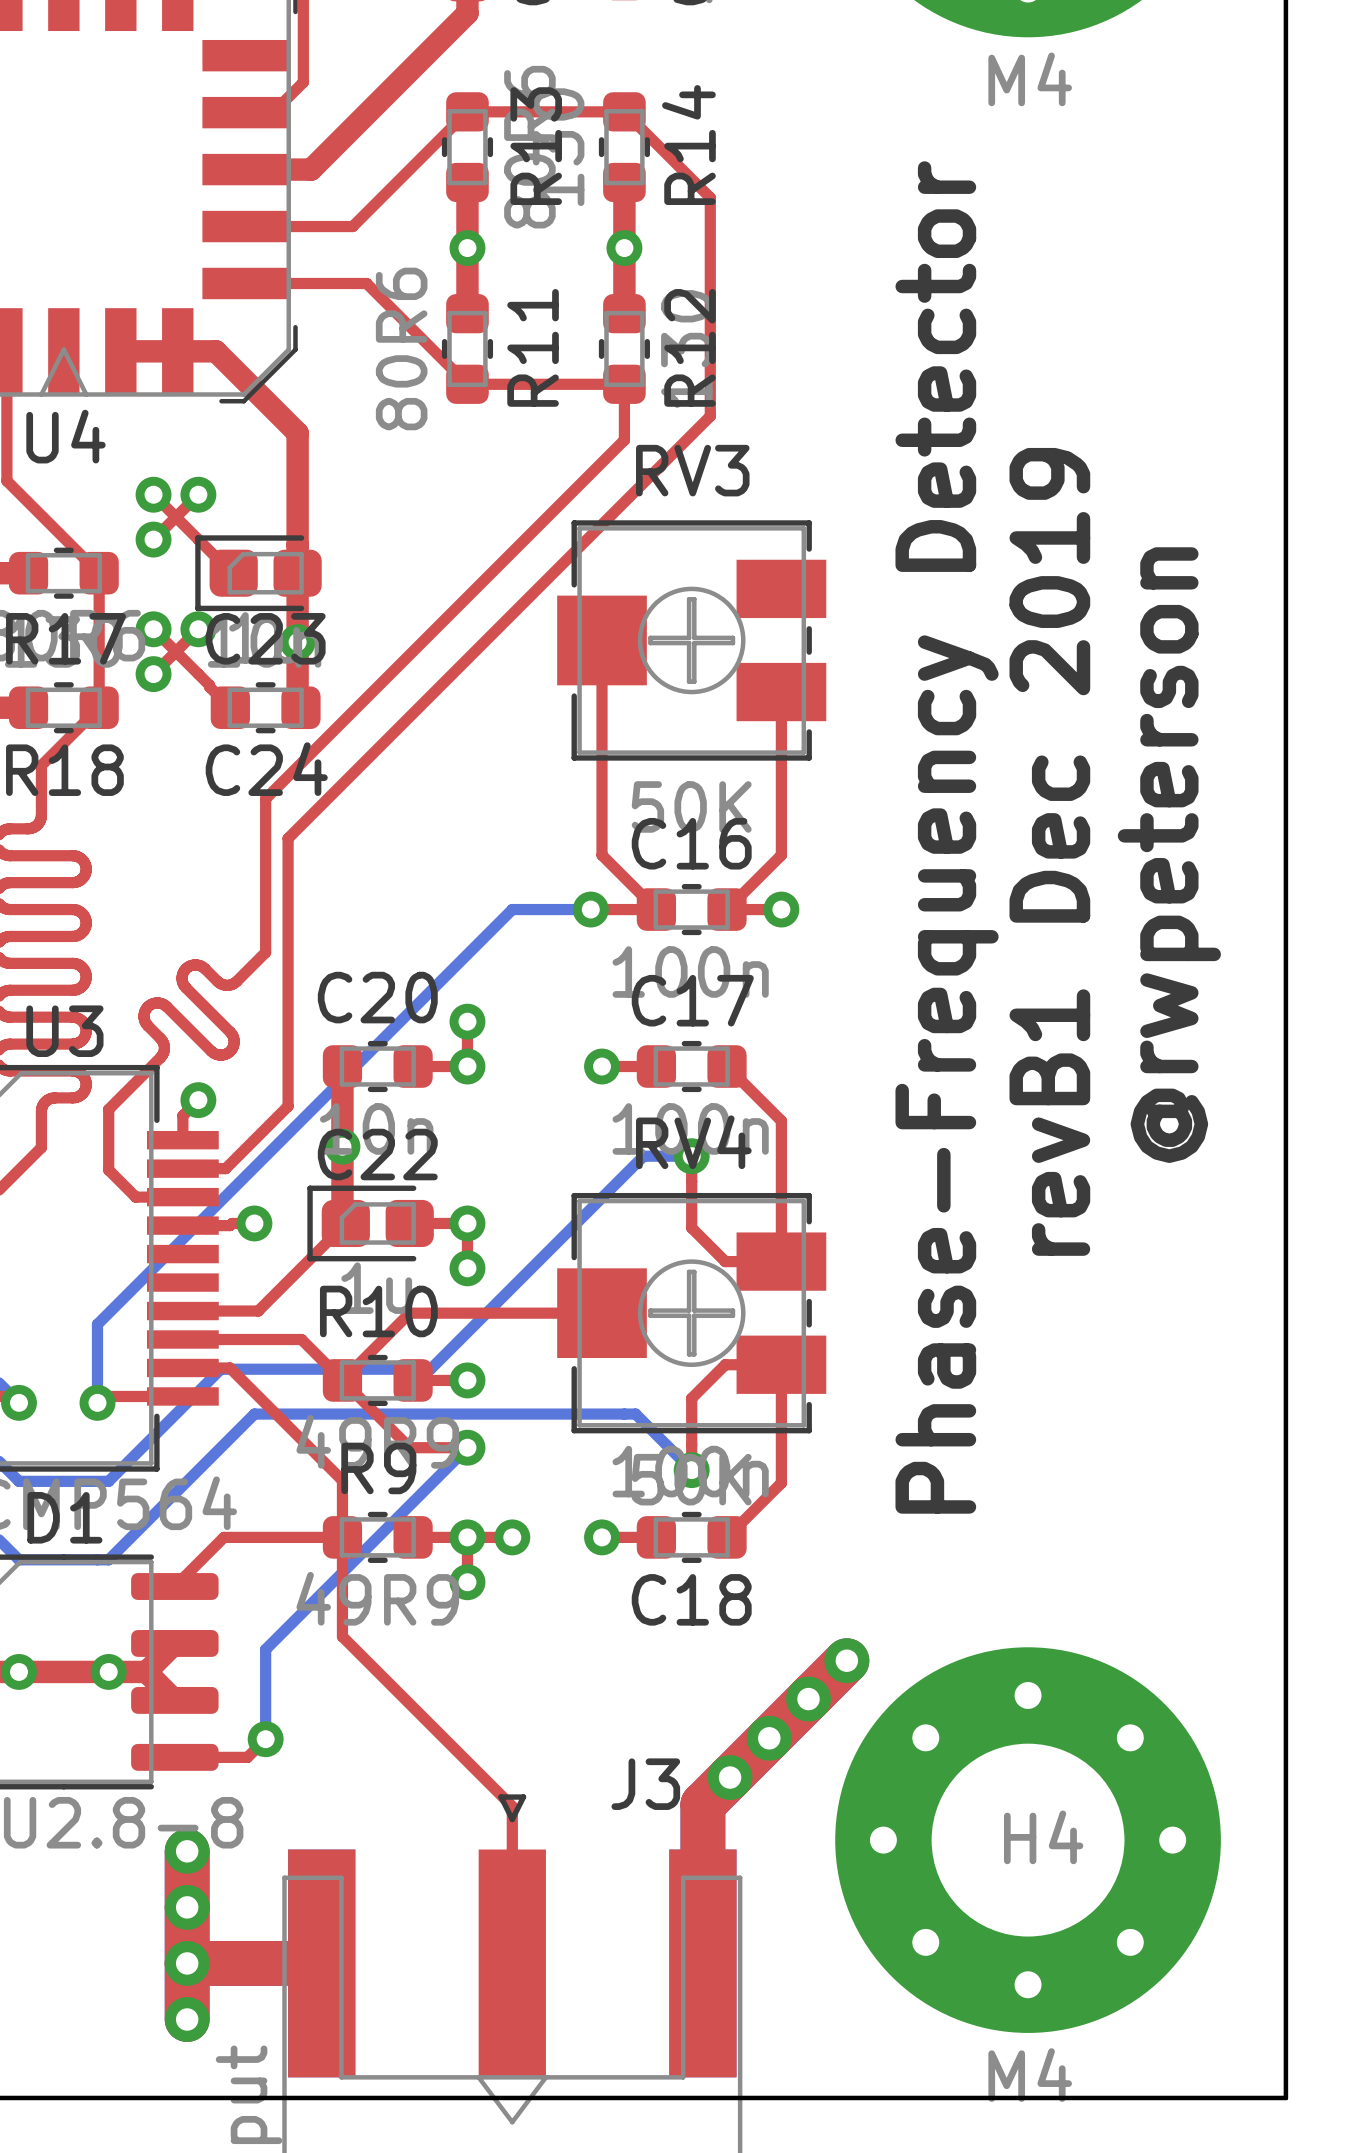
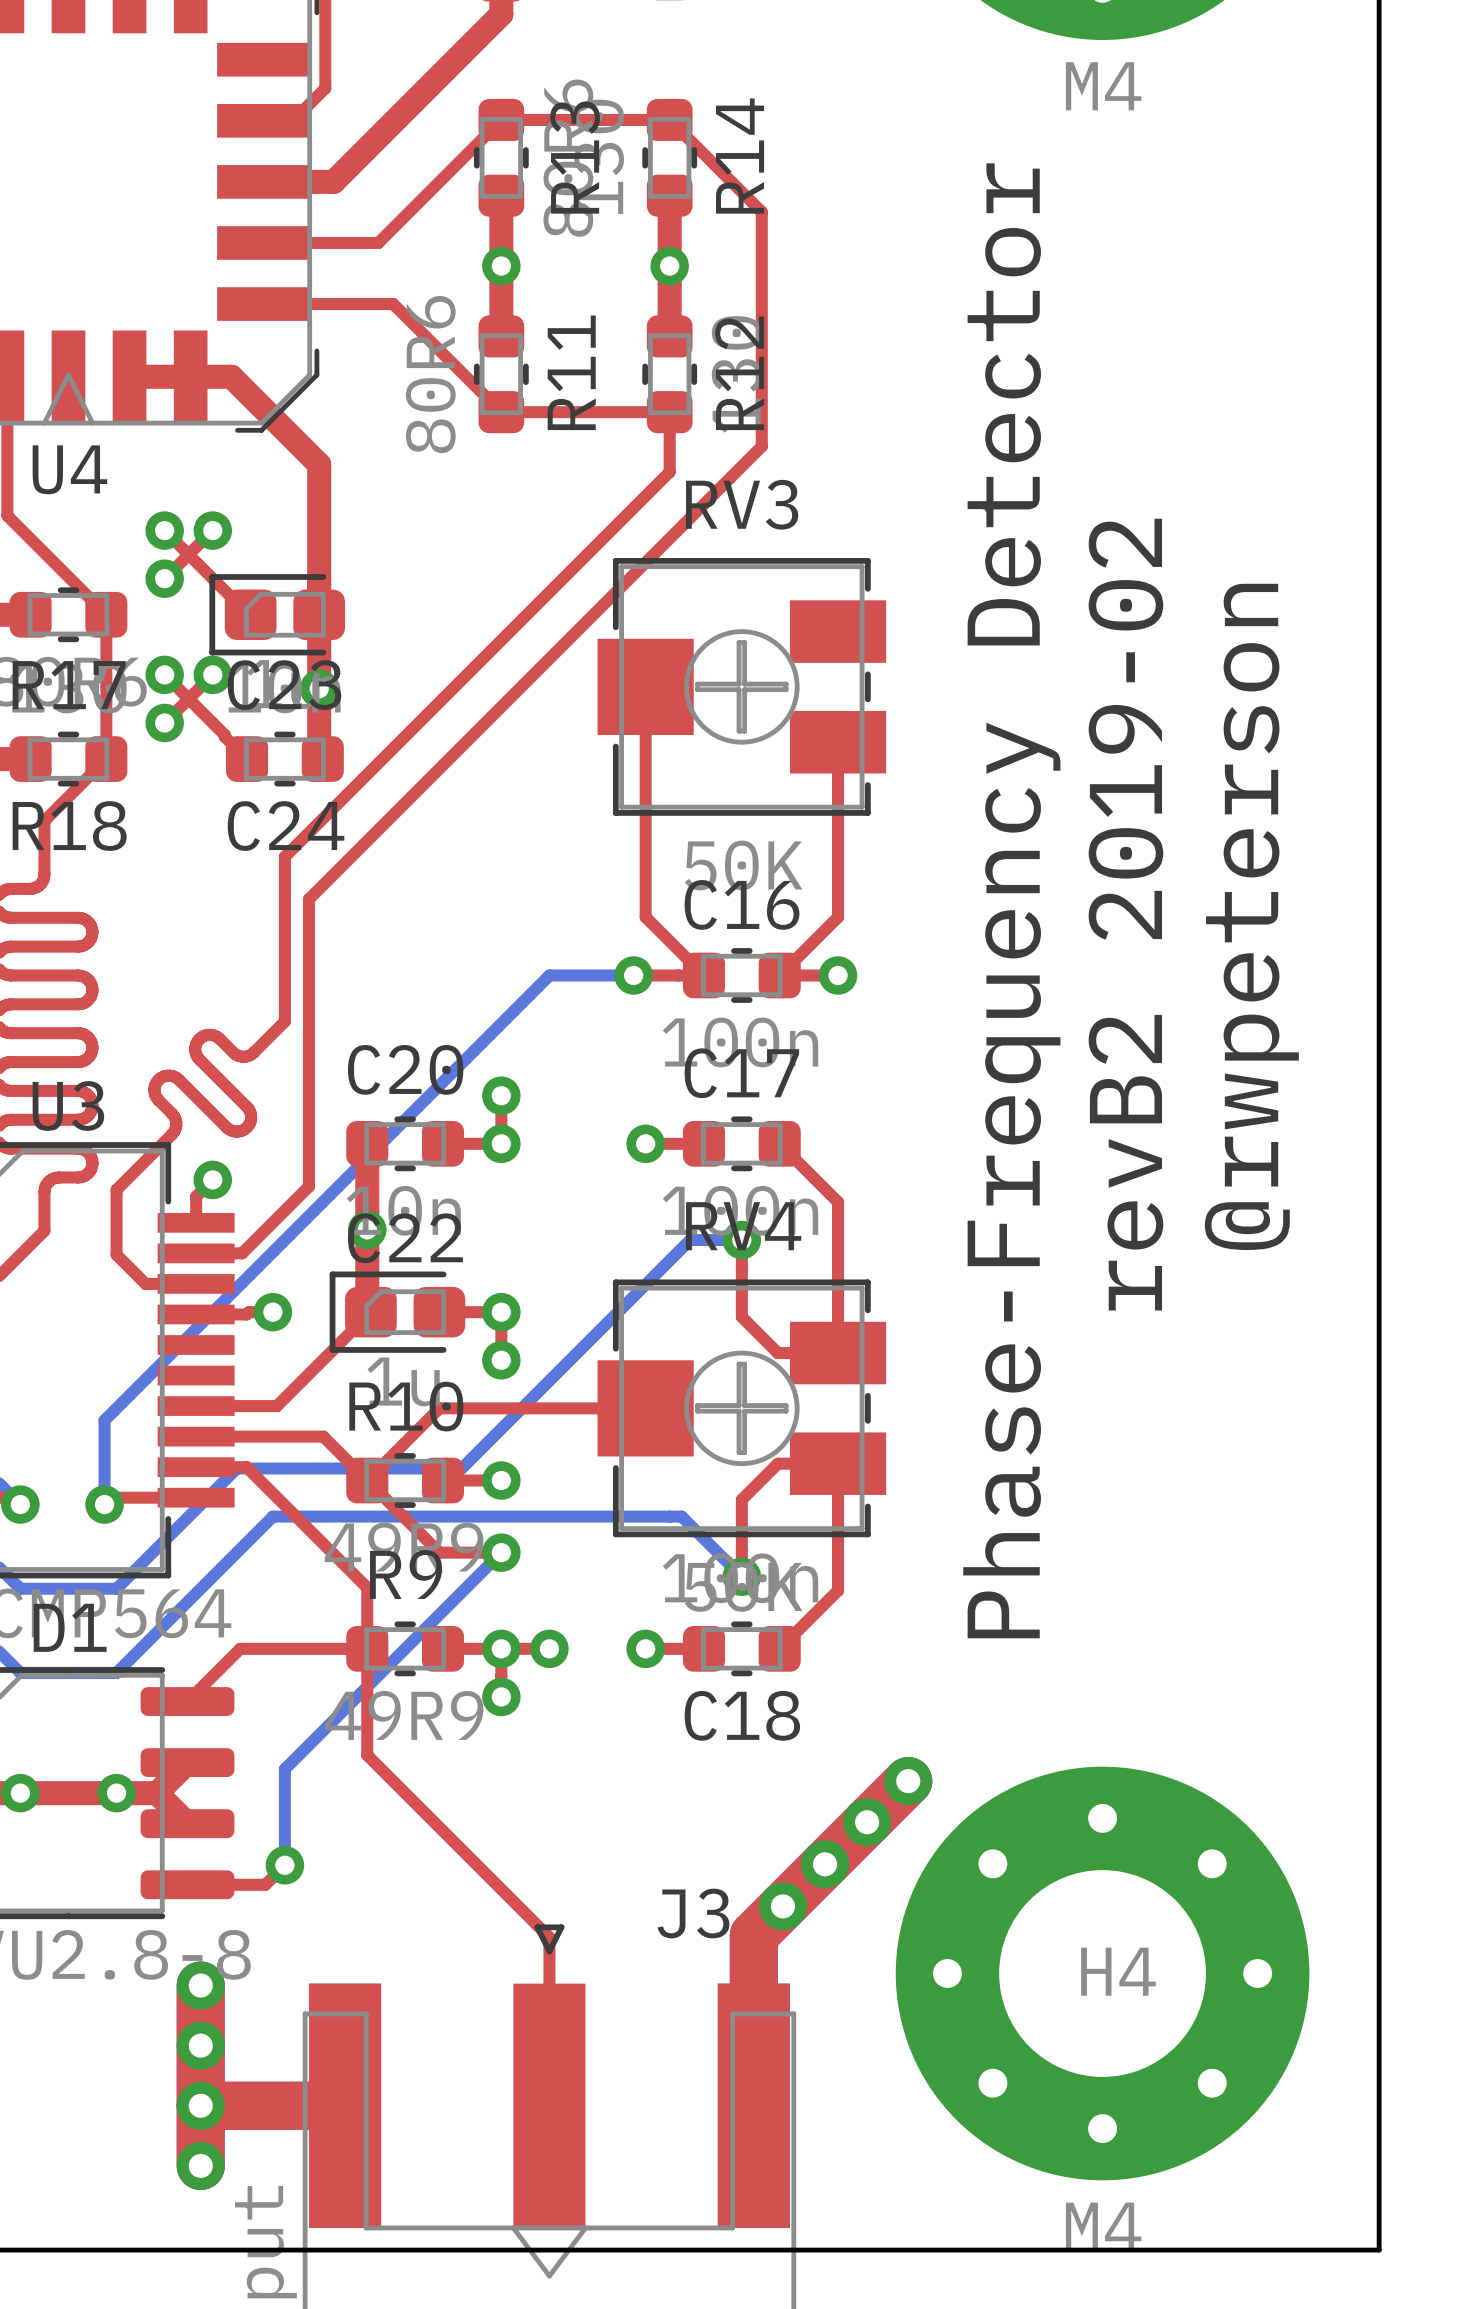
text: revB1 Dec 2019 (1049, 851) -> revB2 2019-02 (1125, 914)

